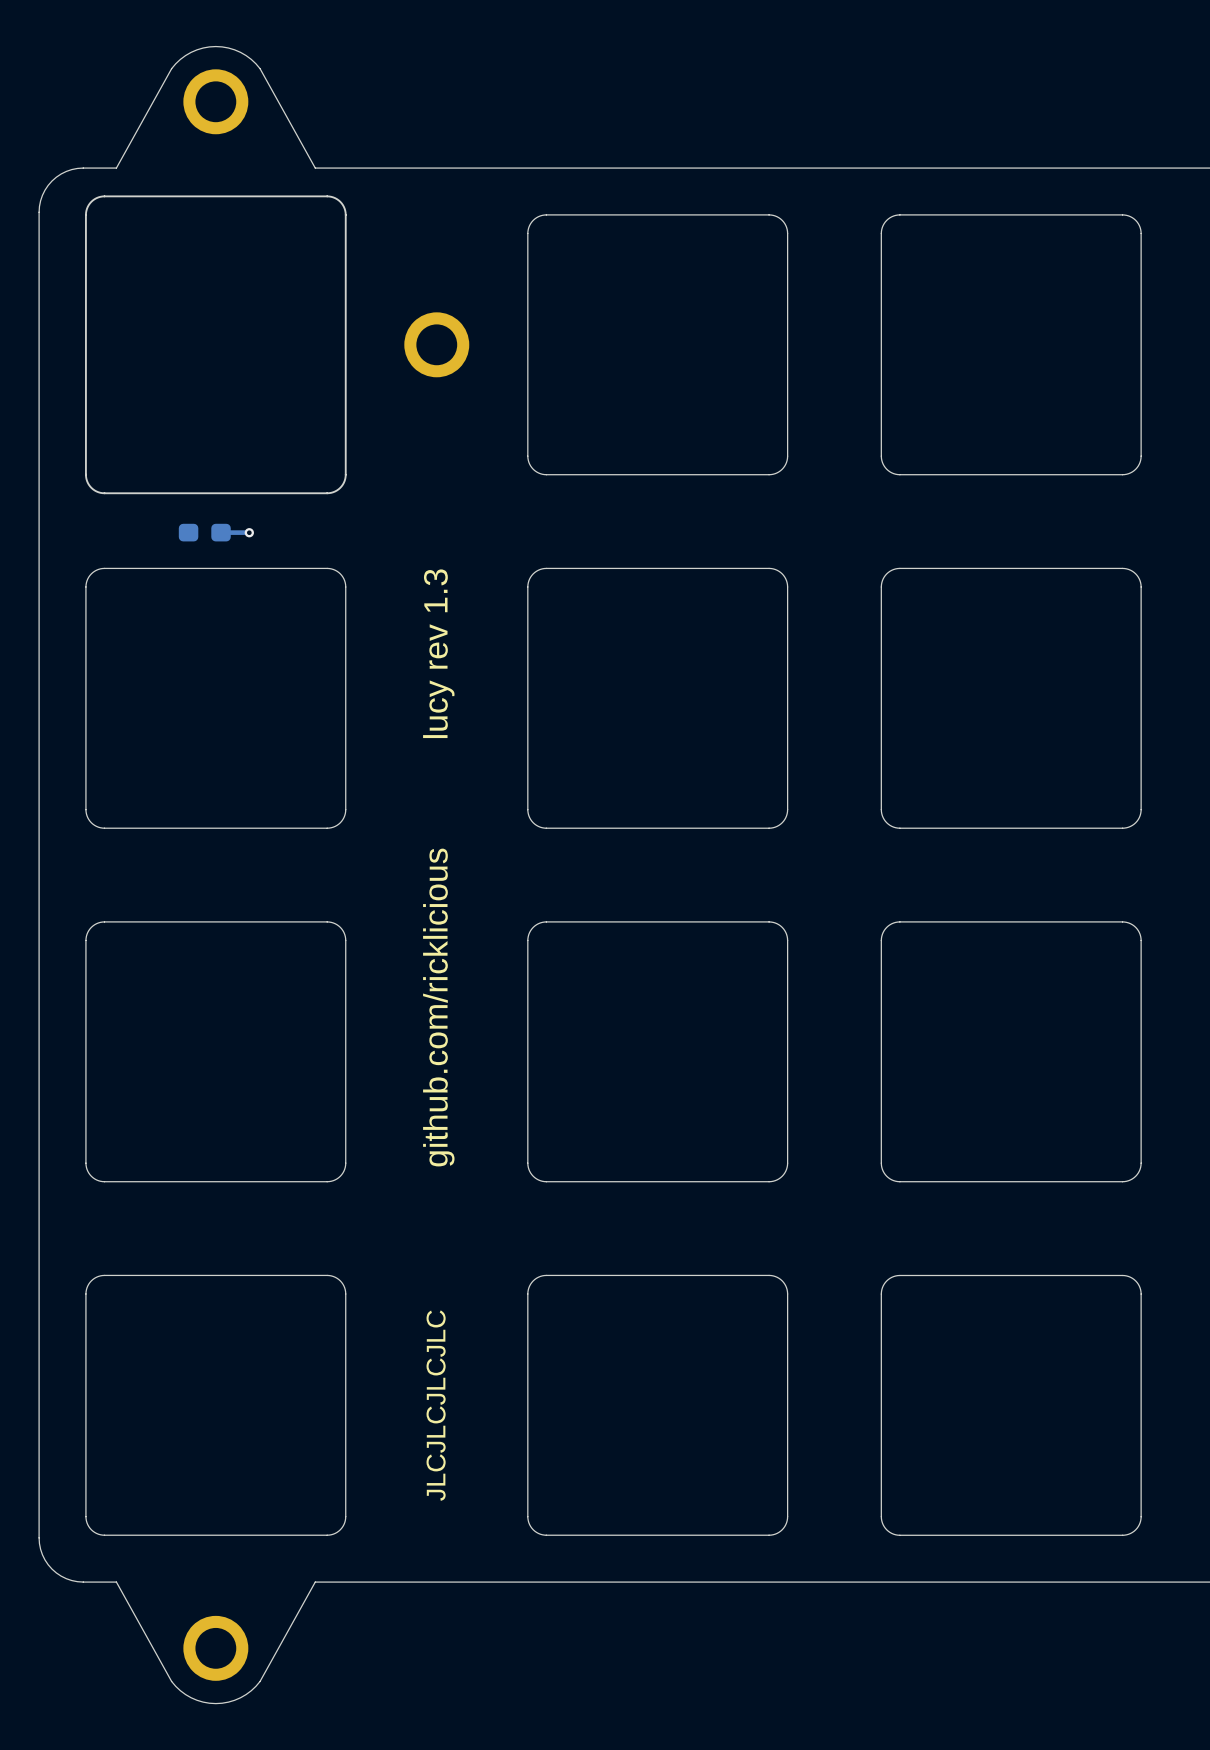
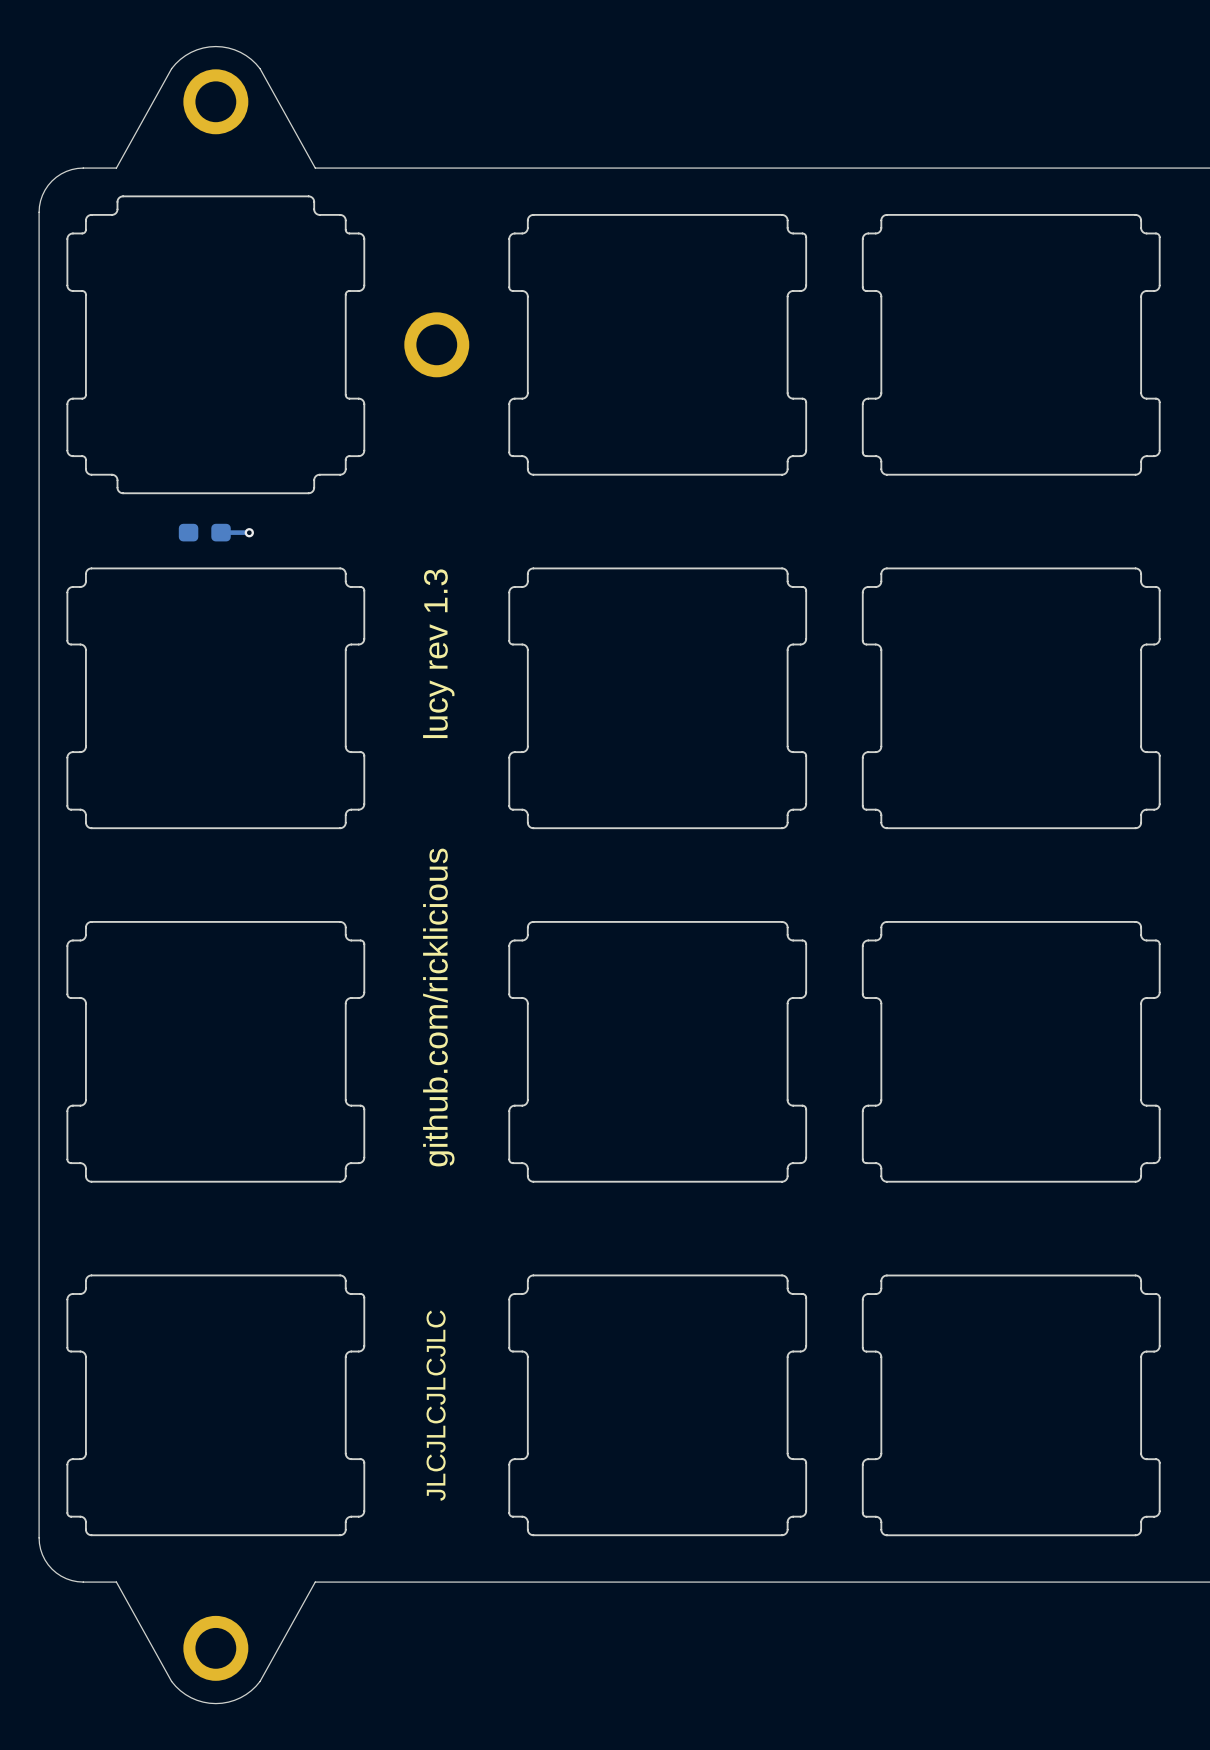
drawing shape: [85, 195, 347, 495] -> [66, 195, 366, 495]
drawing shape: [527, 214, 789, 476] -> [508, 213, 808, 476]
drawing shape: [880, 214, 1142, 476] -> [861, 213, 1161, 476]
drawing shape: [85, 567, 347, 829] -> [66, 567, 366, 830]
drawing shape: [527, 567, 789, 829] -> [508, 567, 808, 830]
drawing shape: [880, 567, 1142, 829] -> [861, 567, 1161, 830]
drawing shape: [85, 921, 347, 1183] -> [66, 920, 366, 1183]
drawing shape: [527, 921, 789, 1183] -> [508, 920, 808, 1183]
drawing shape: [880, 921, 1142, 1183] -> [861, 920, 1161, 1183]
drawing shape: [85, 1274, 347, 1536] -> [66, 1274, 366, 1537]
drawing shape: [527, 1274, 789, 1536] -> [508, 1274, 808, 1537]
drawing shape: [880, 1275, 1142, 1536] -> [861, 1274, 1161, 1537]

